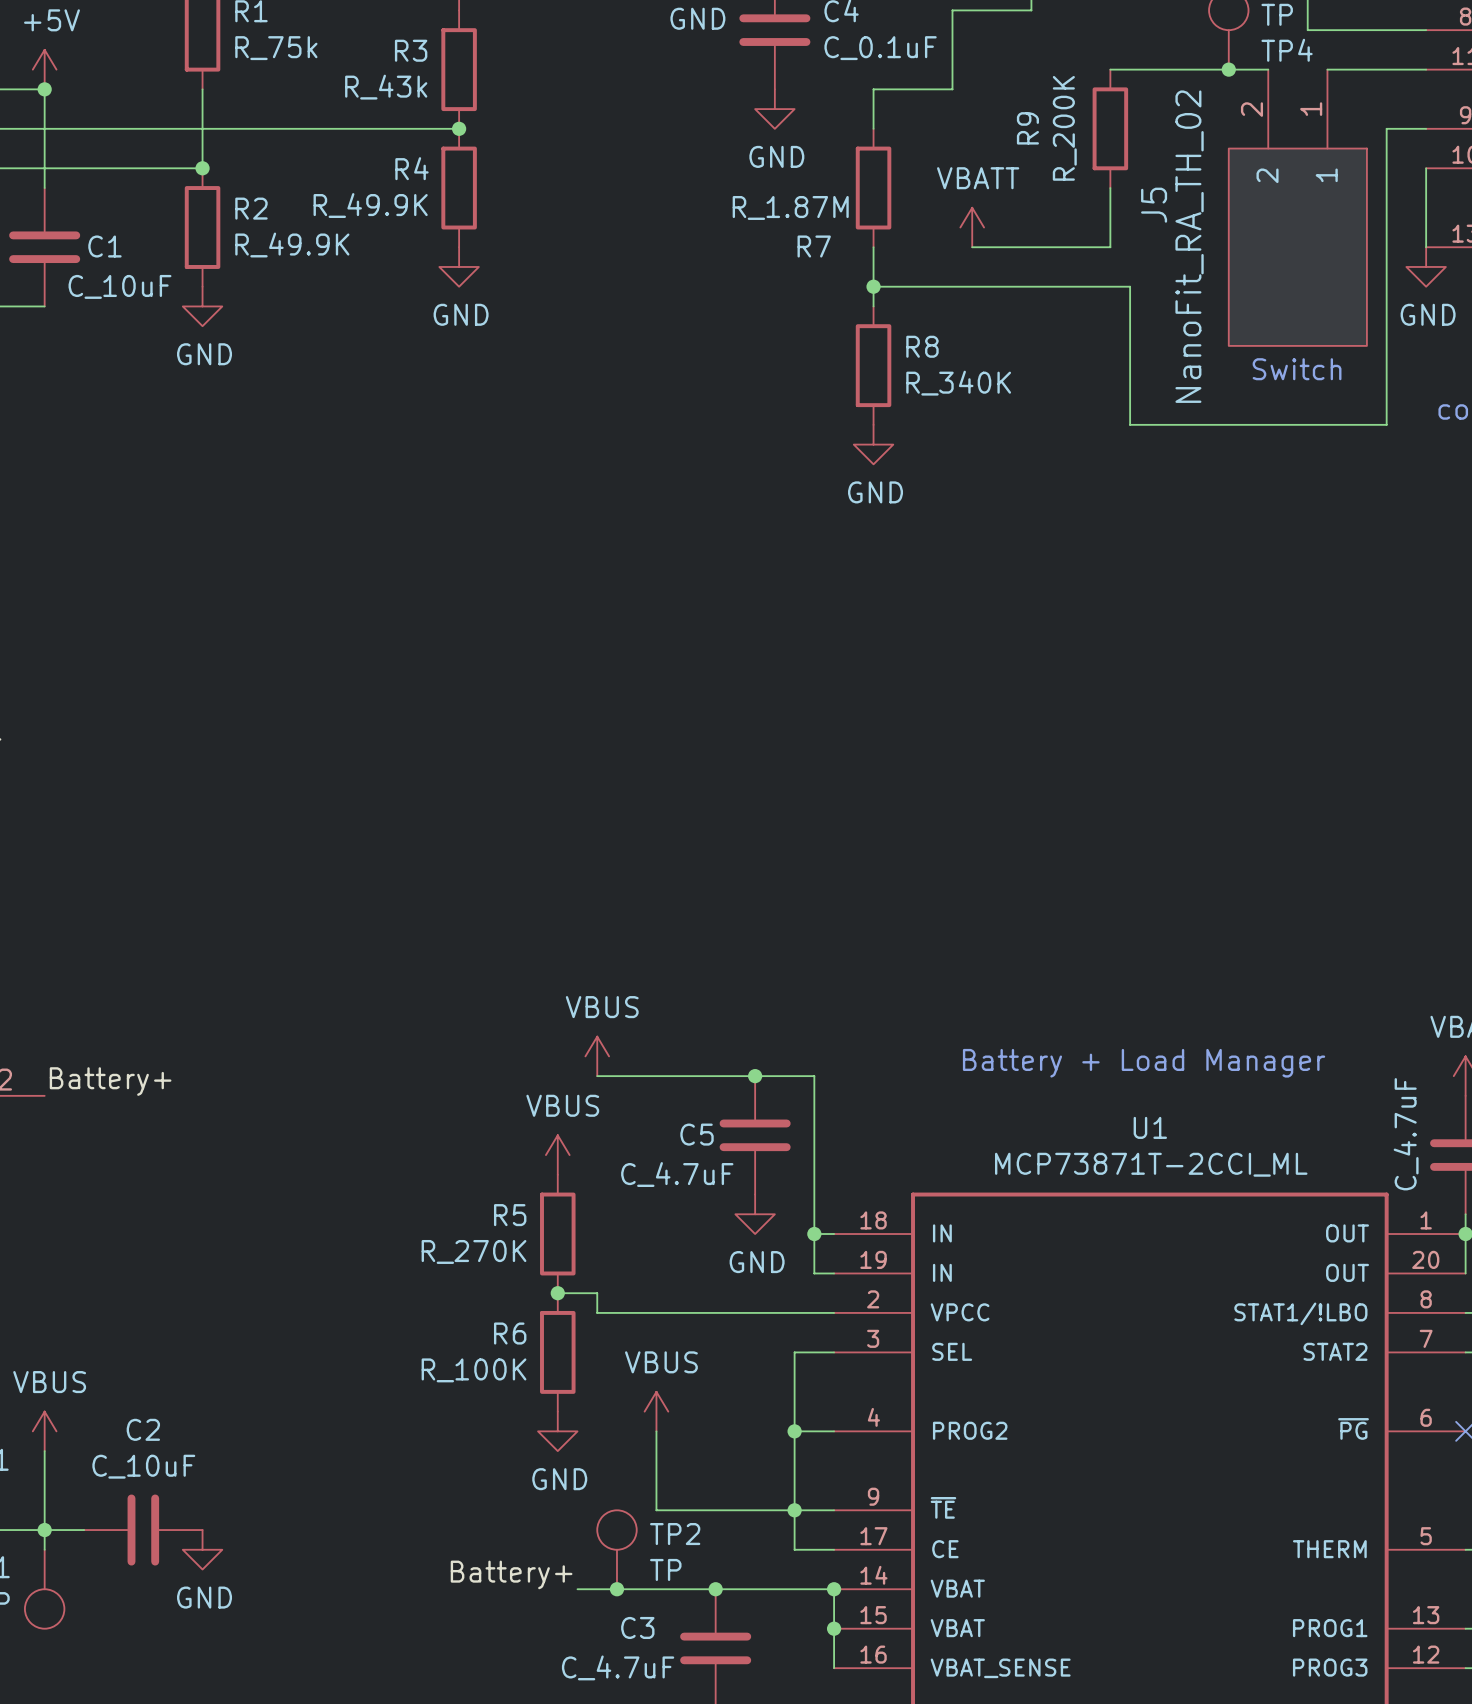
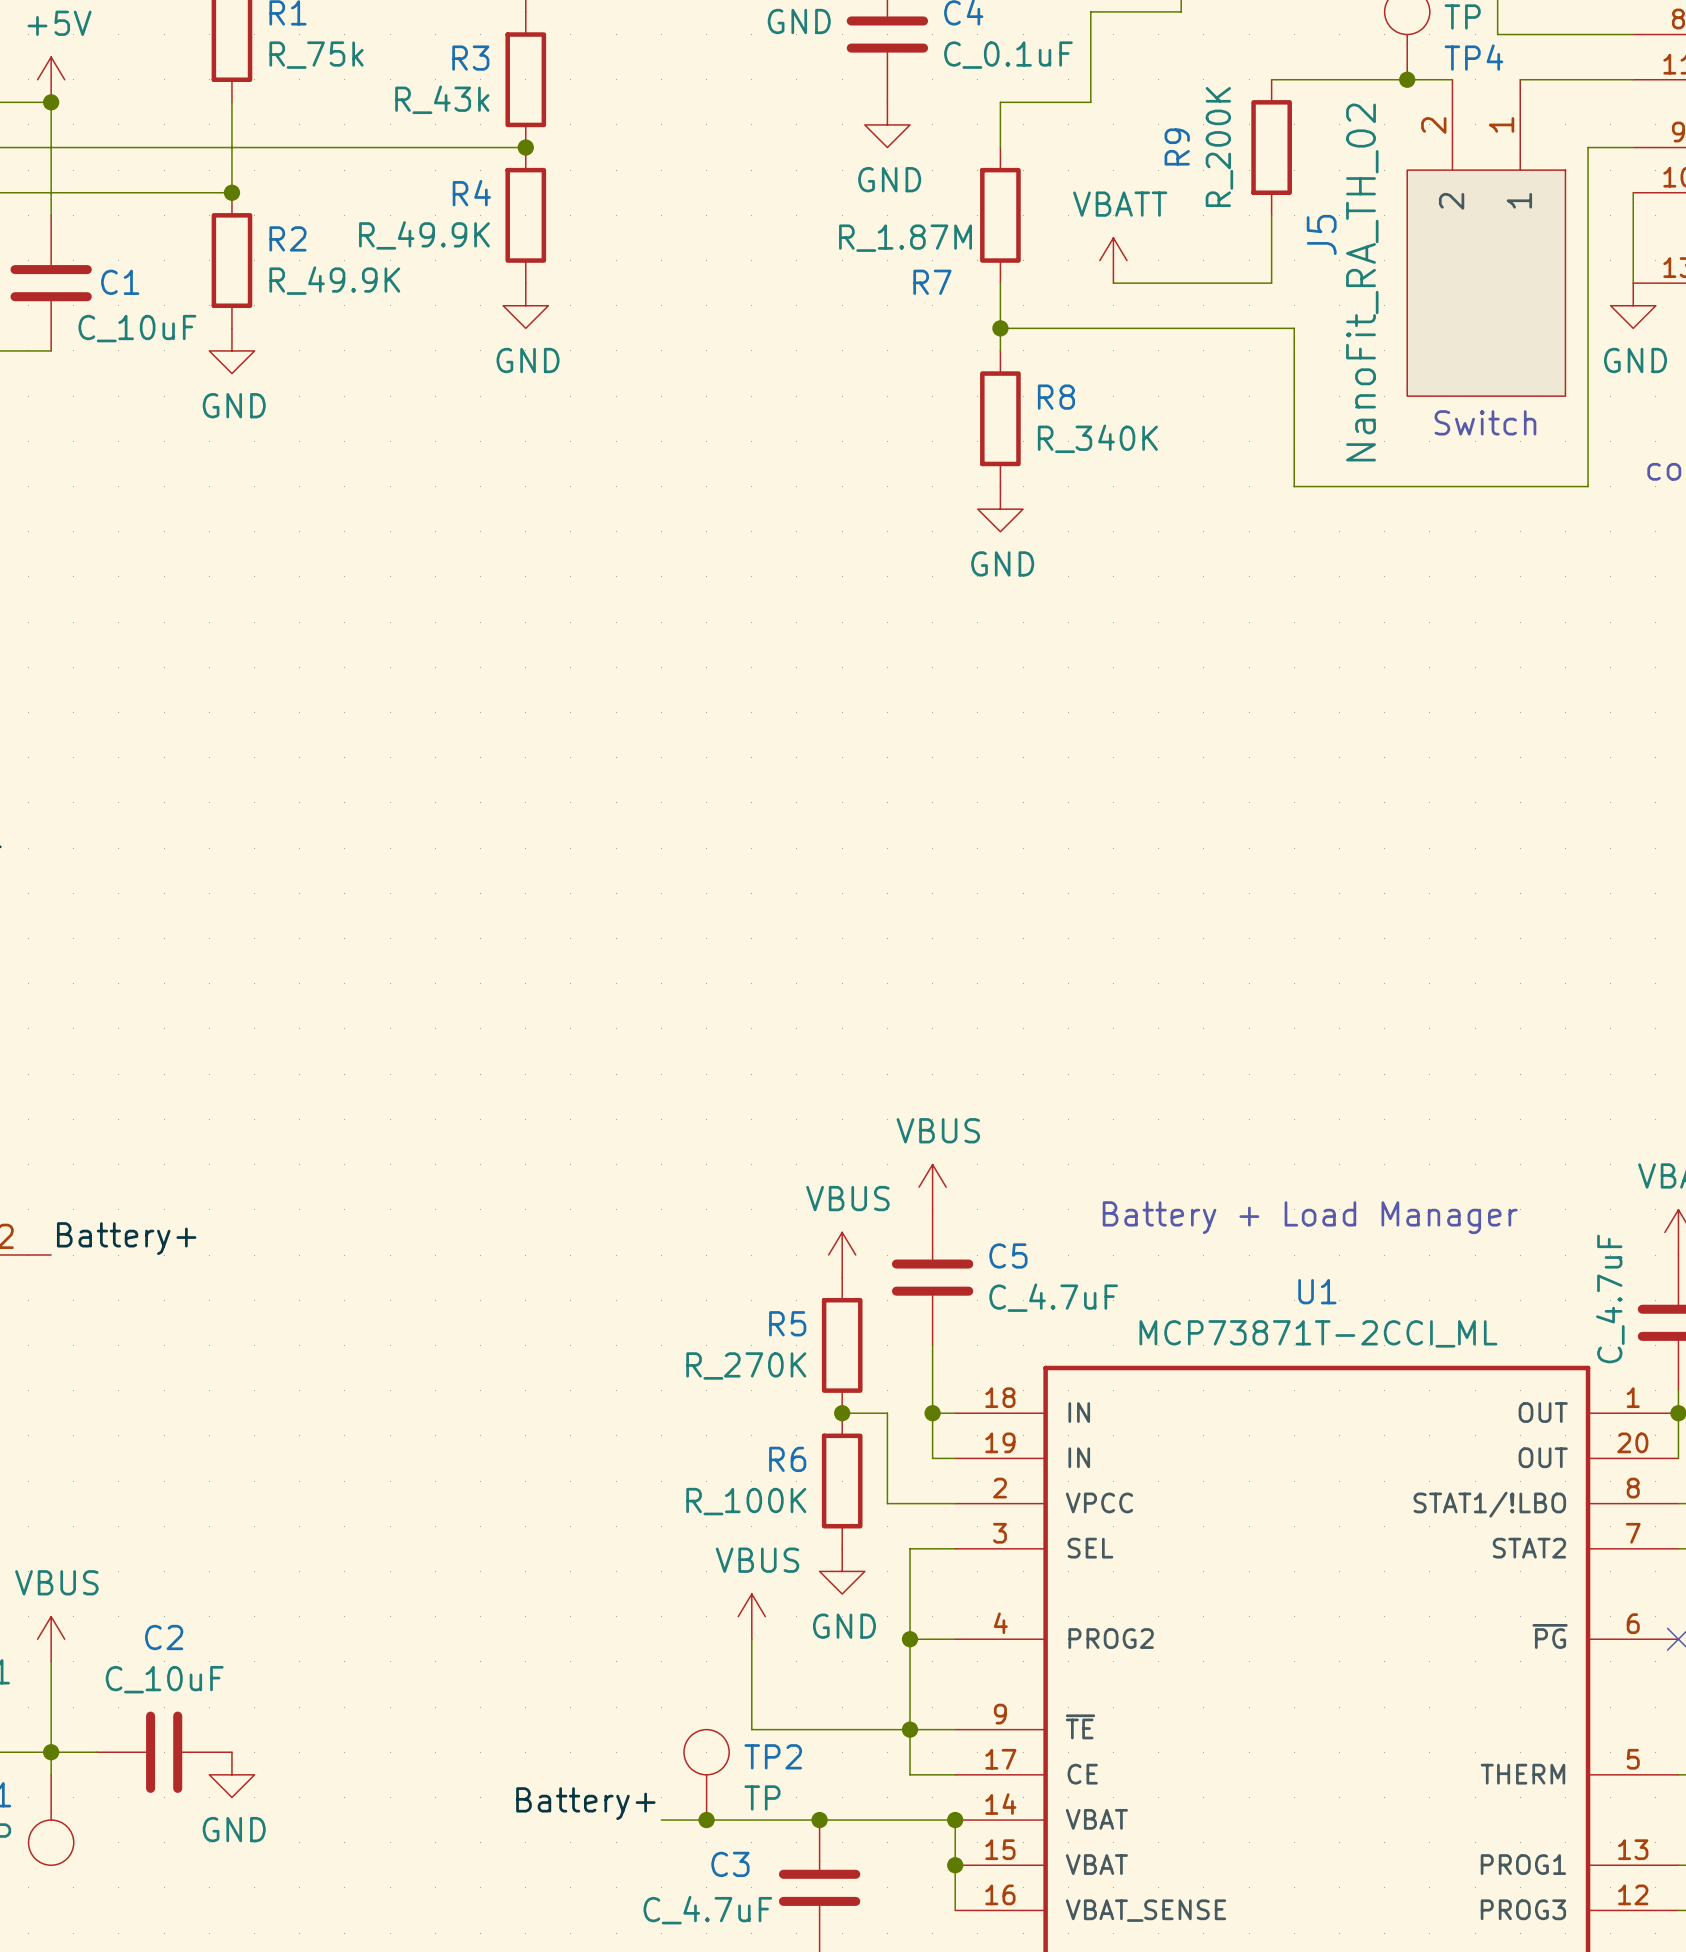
power symbol: none -> VBUS (932, 1187)
power symbol: VBUS (597, 1056) -> none
wire: (597, 1076) (814, 1076) (814, 1174) -> none
junction: (755, 1076) -> none
power symbol: none -> VBUS (842, 1255)
C5 name position: C5 (697, 1134) -> C5 (1008, 1255)
C5 position: (755, 1135) -> (932, 1277)
power symbol: VBUS (557, 1155) -> none
C5 value position: C_4.7uF (677, 1174) -> C_4.7uF (1053, 1297)
power symbol: GND (755, 1214) -> none
R5 position: (557, 1234) -> (842, 1345)
junction: none -> (842, 1413)
wire: (557, 1293) (597, 1293) (597, 1312) (774, 1312) -> (842, 1413) (887, 1413) (887, 1503)
junction: (557, 1293) -> none
R6 position: (557, 1352) -> (842, 1481)
power symbol: none -> GND (842, 1571)
power symbol: GND (557, 1431) -> none

